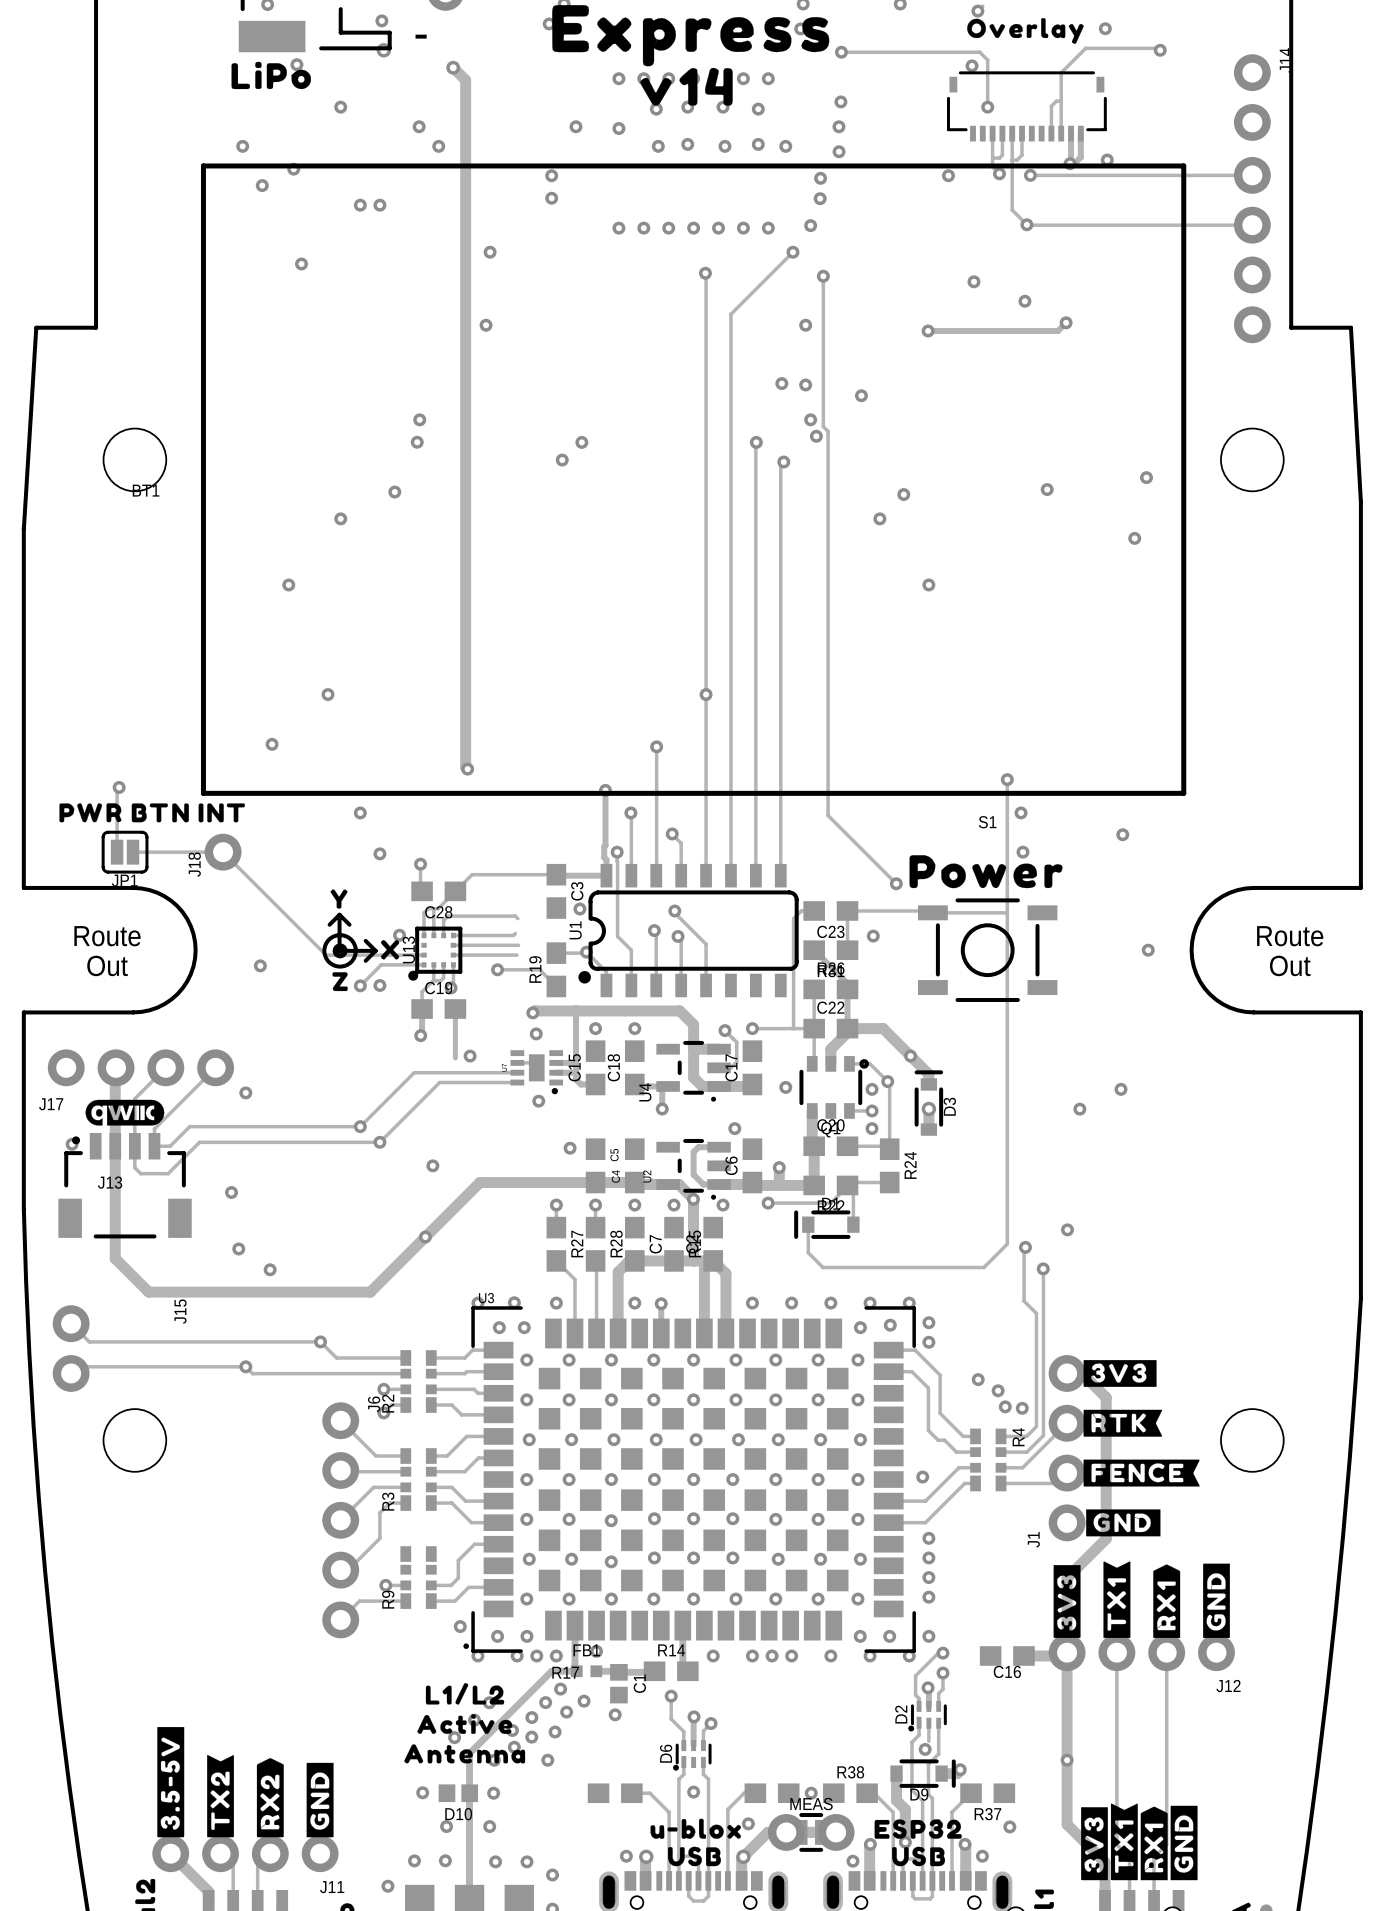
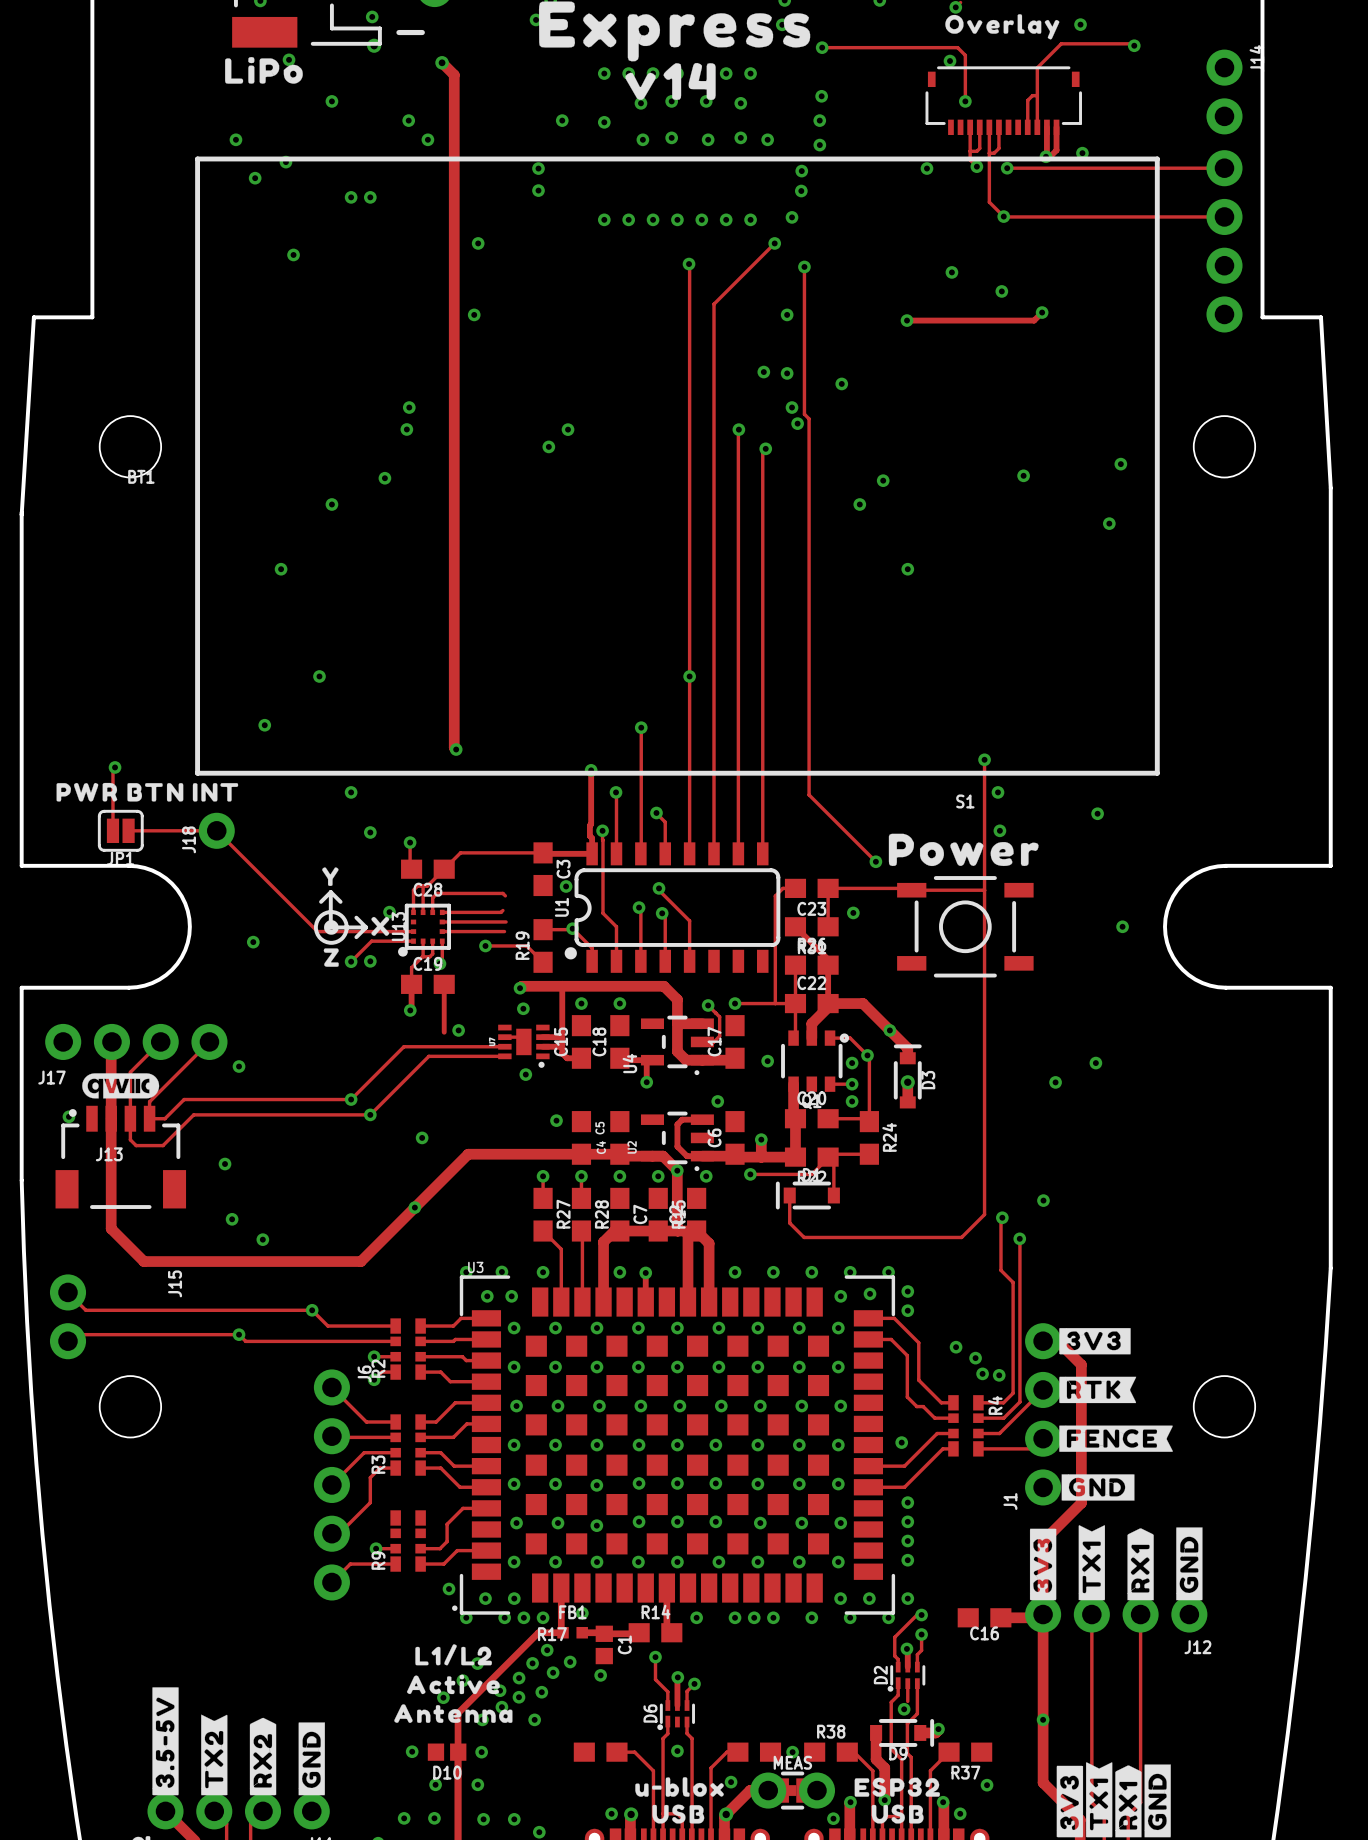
text: Route (107, 936) -> none
text: Route (1290, 936) -> none
text: Out (107, 965) -> none
text: Out (1290, 965) -> none

